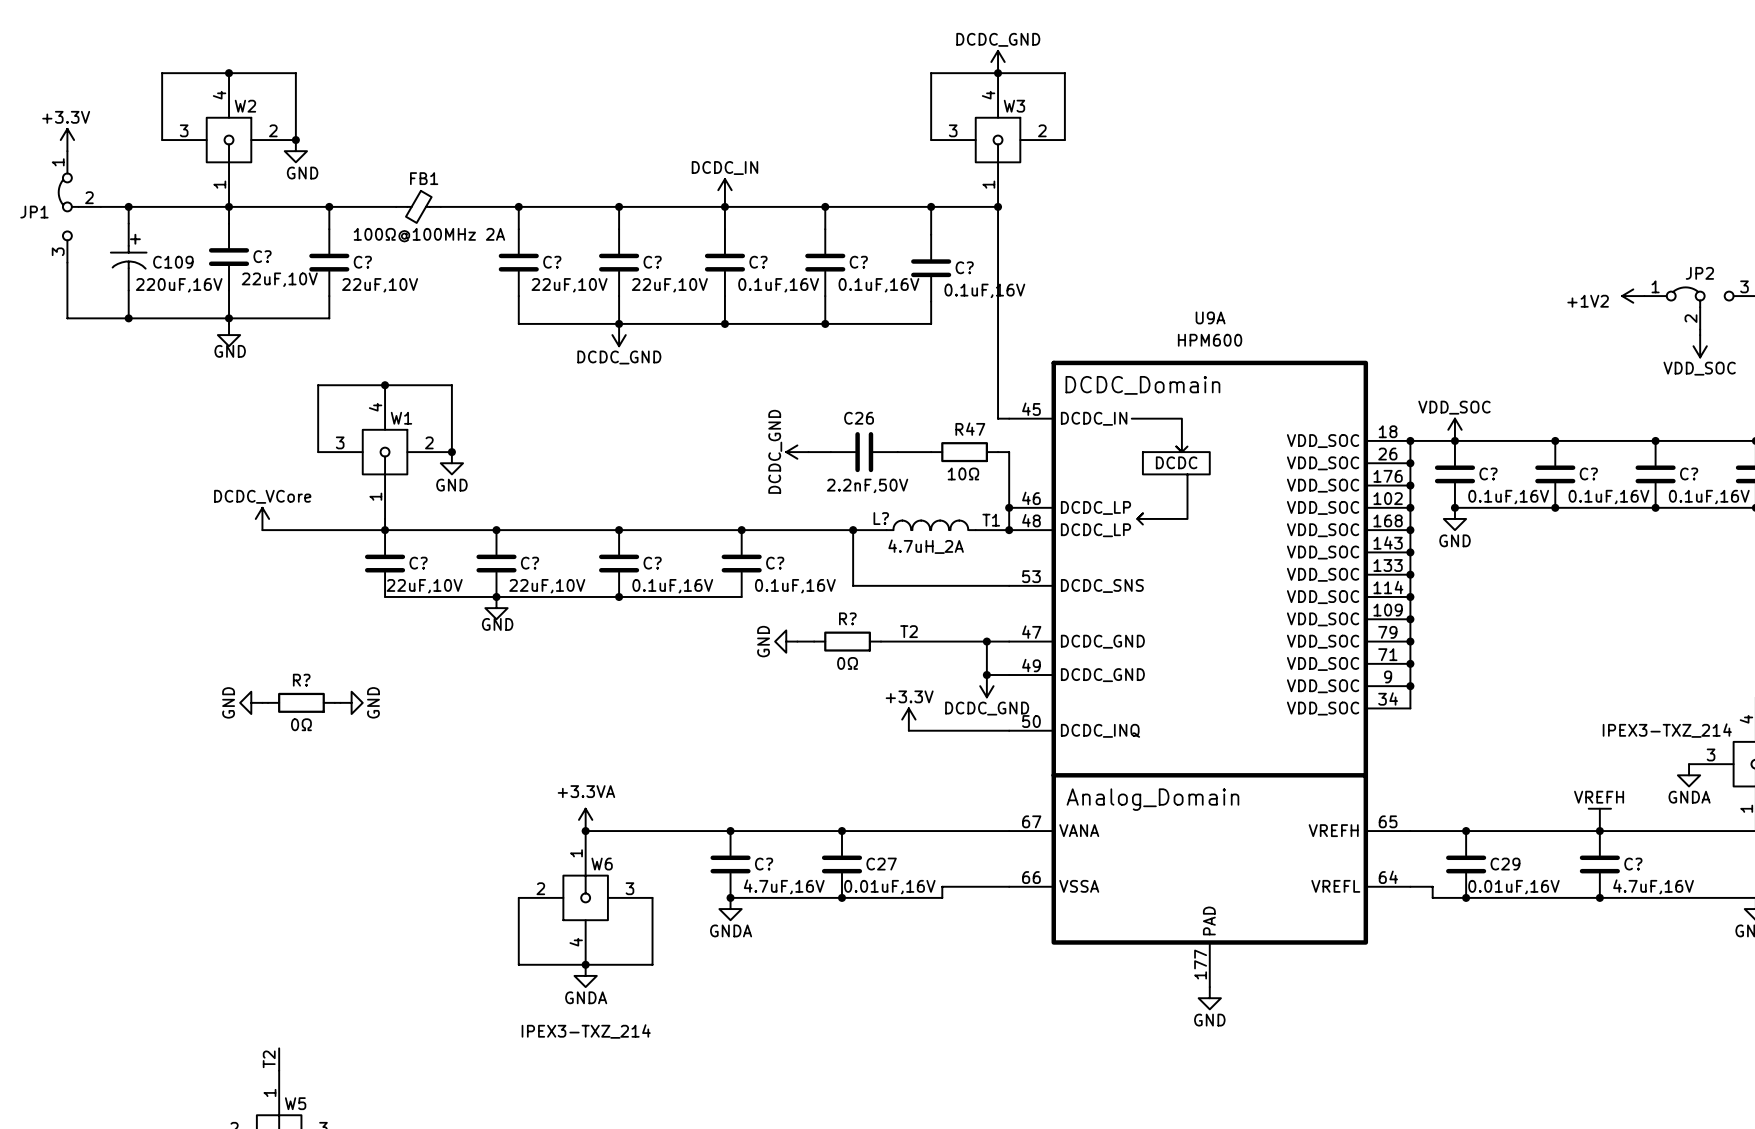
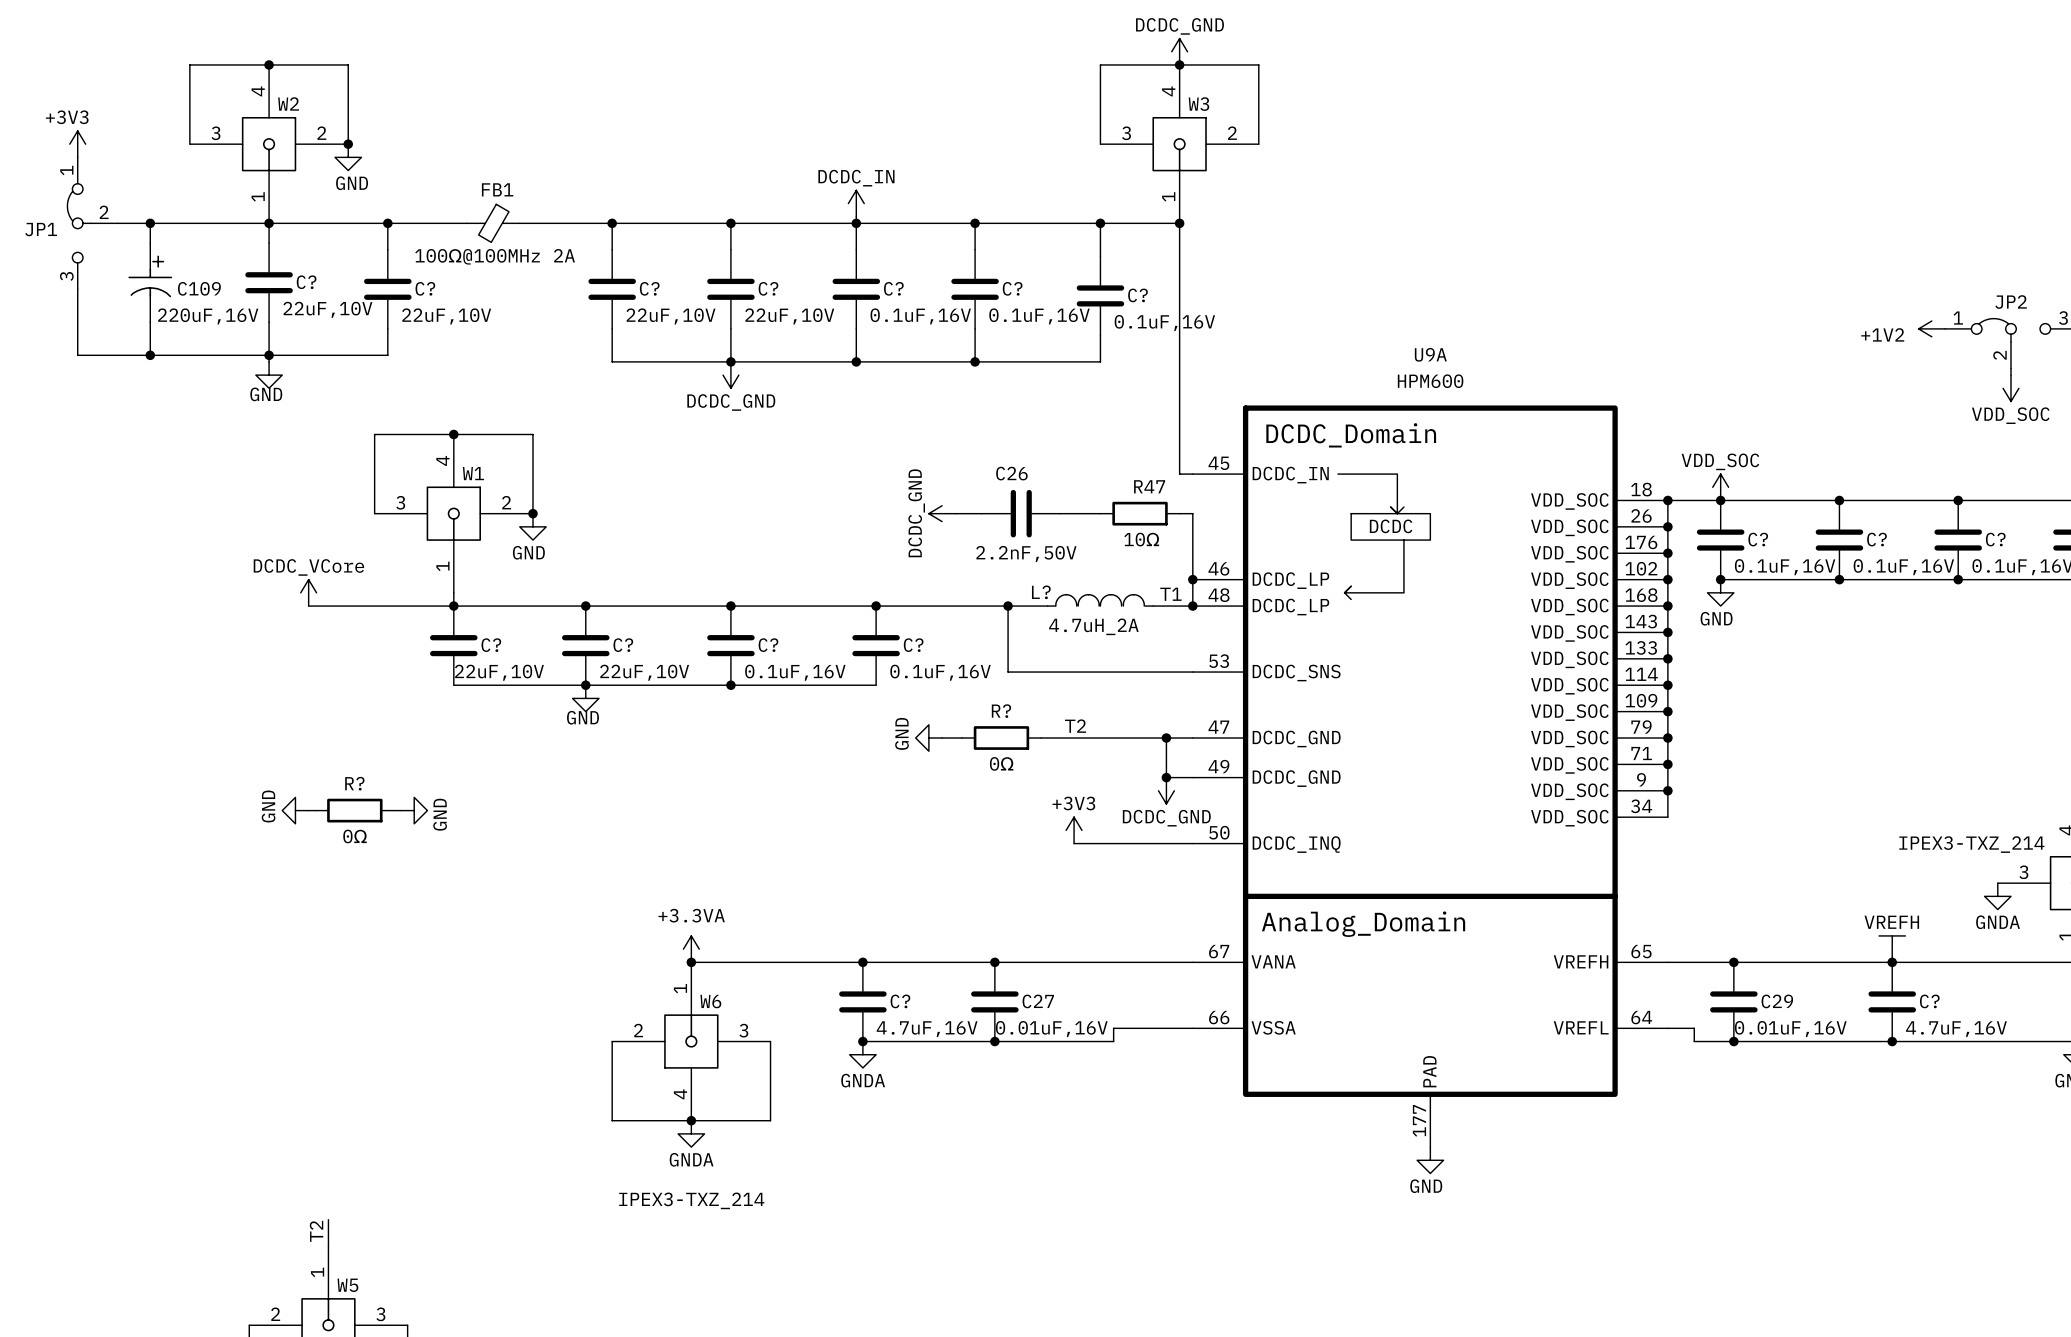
power symbol: +3.3V (67, 140) -> +3V3 (77, 144)
power symbol: +3.3V (908, 719) -> +3V3 (1074, 830)

